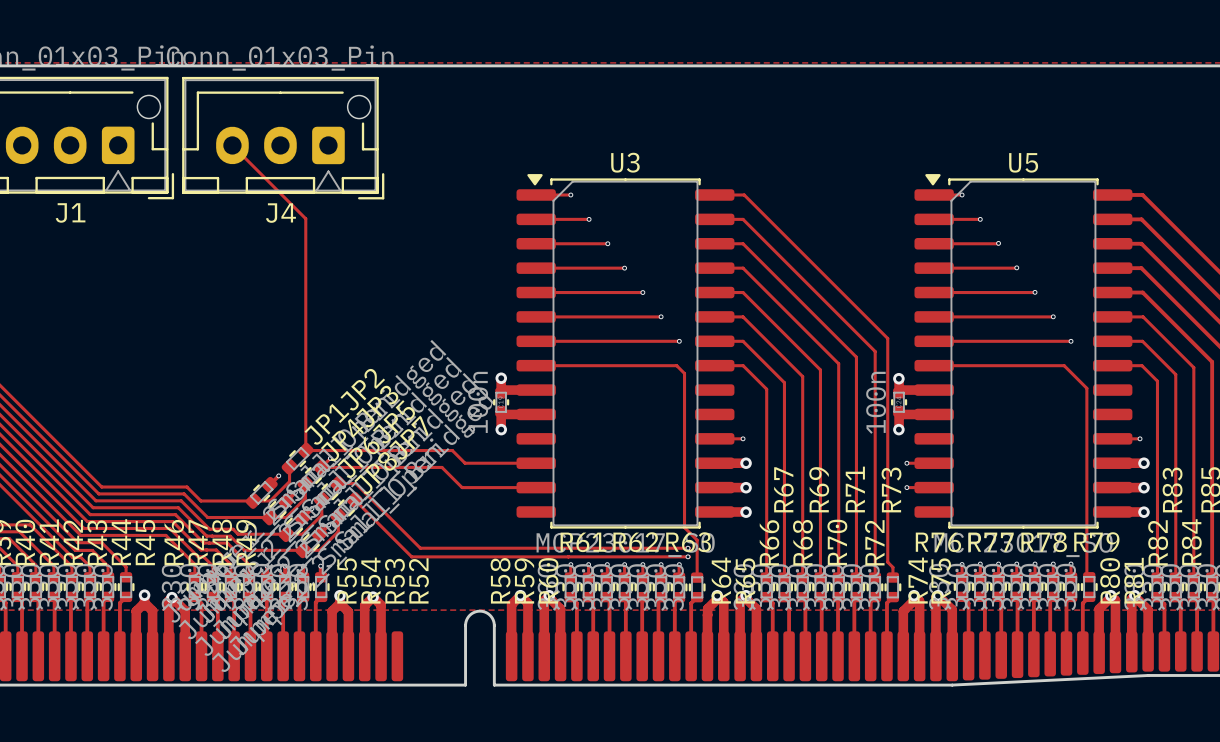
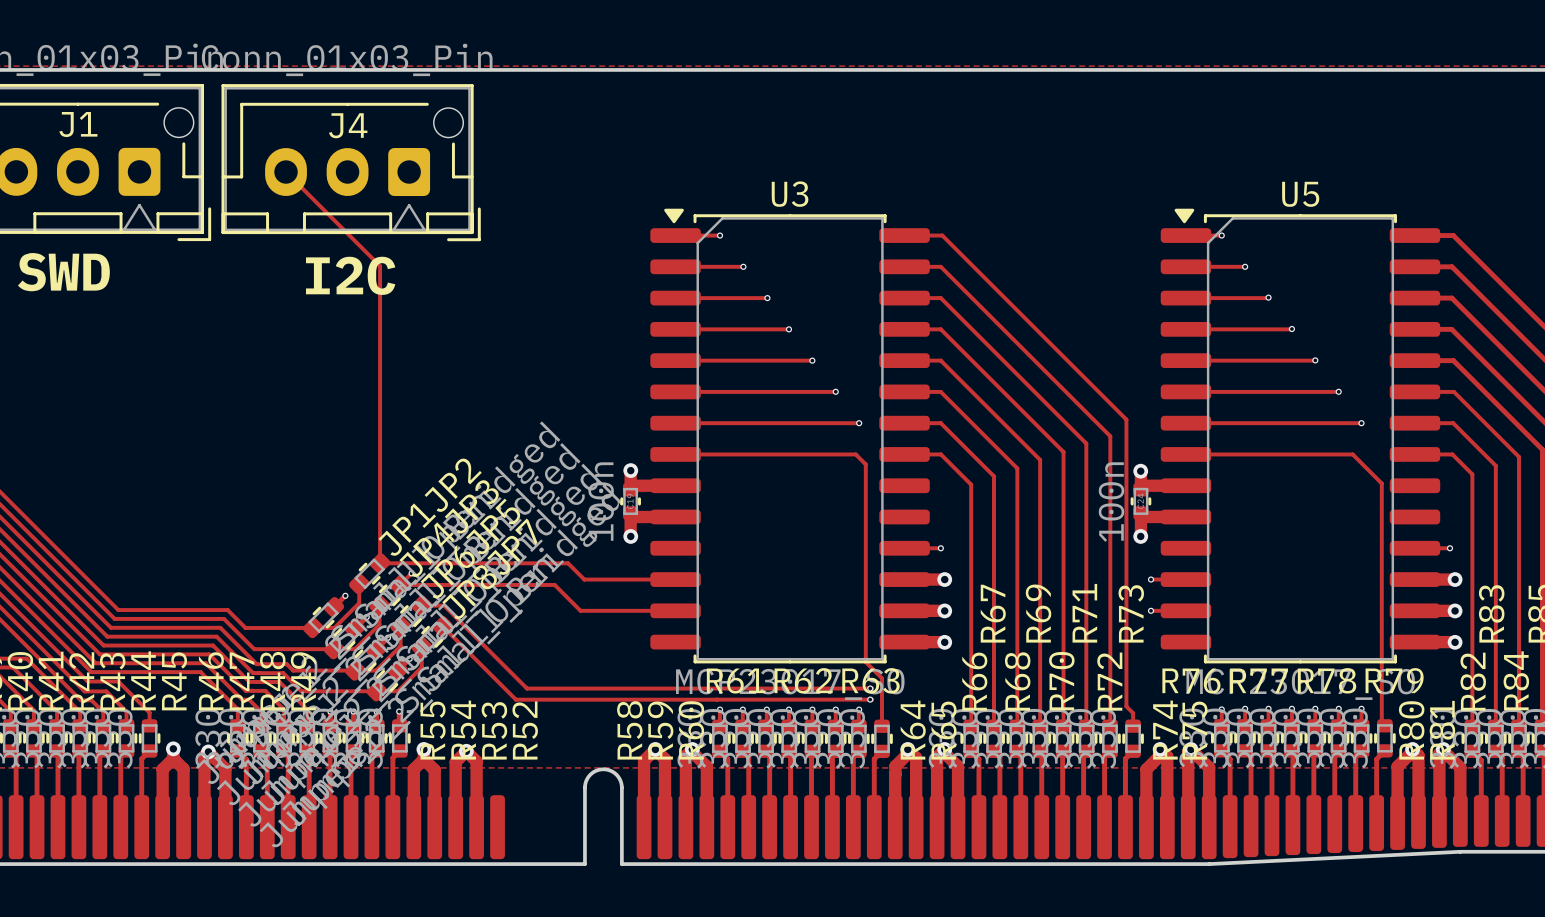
J1 name position: J1 (70, 212) -> J1 (78, 124)
J4 name position: J4 (280, 213) -> J4 (348, 125)
text: none -> SWD (63, 272)
text: none -> I2C (350, 275)

